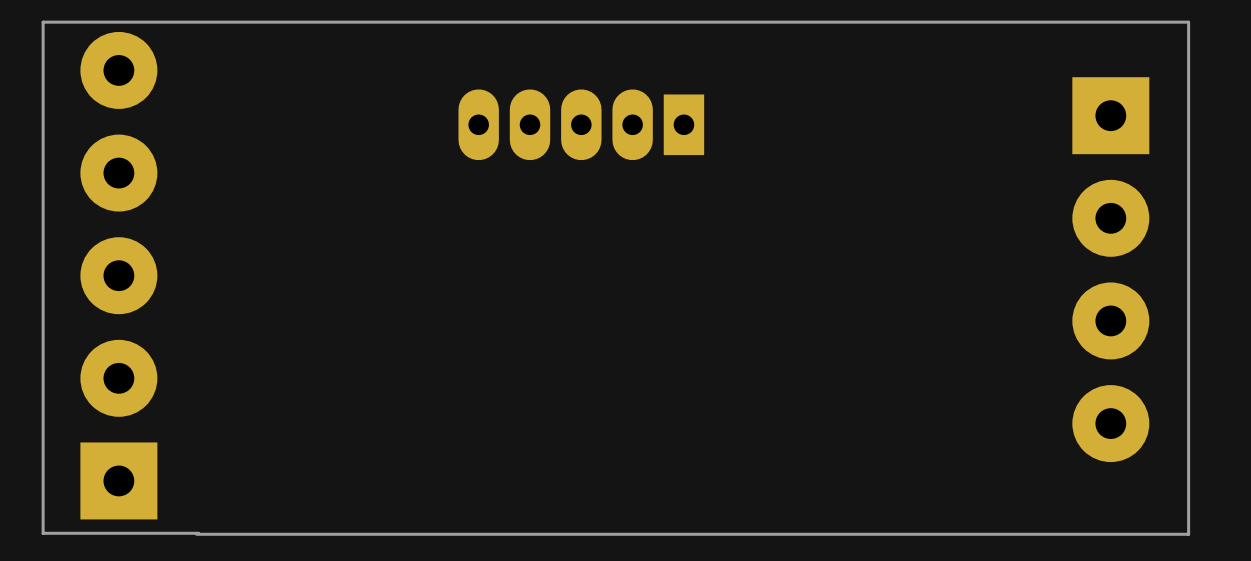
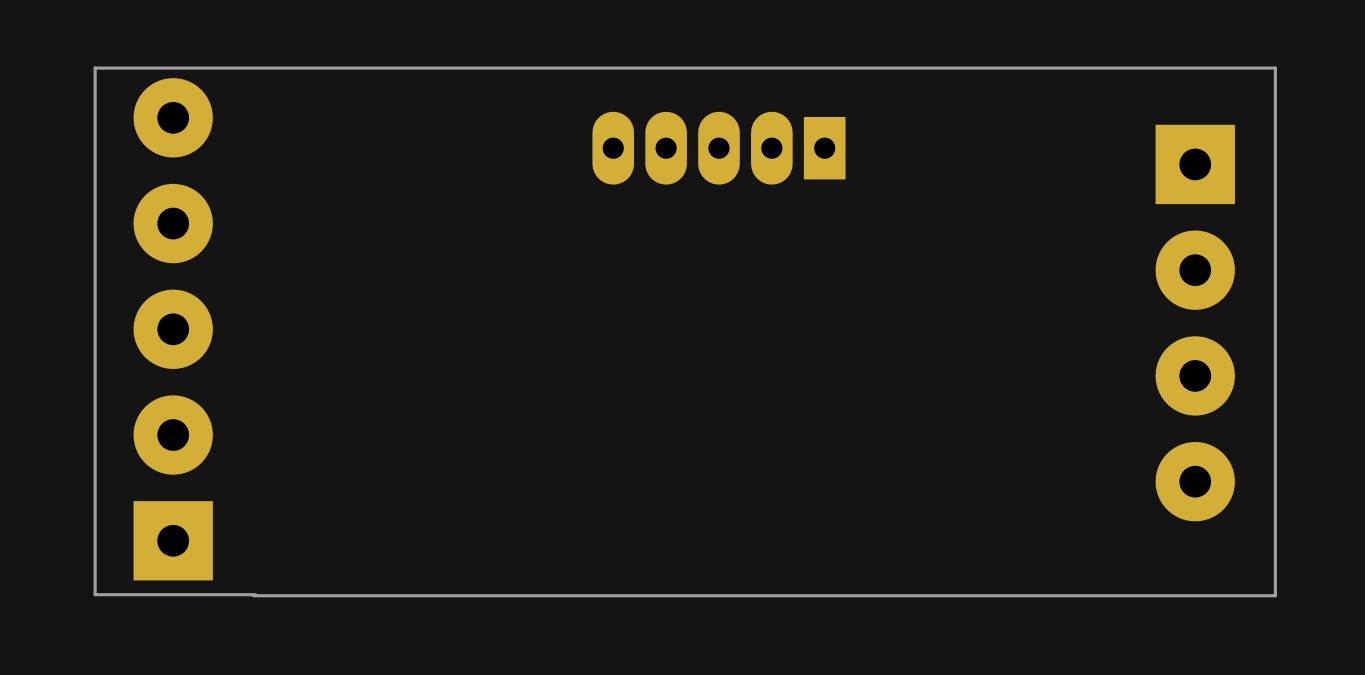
part position: (581, 124) -> (718, 148)

